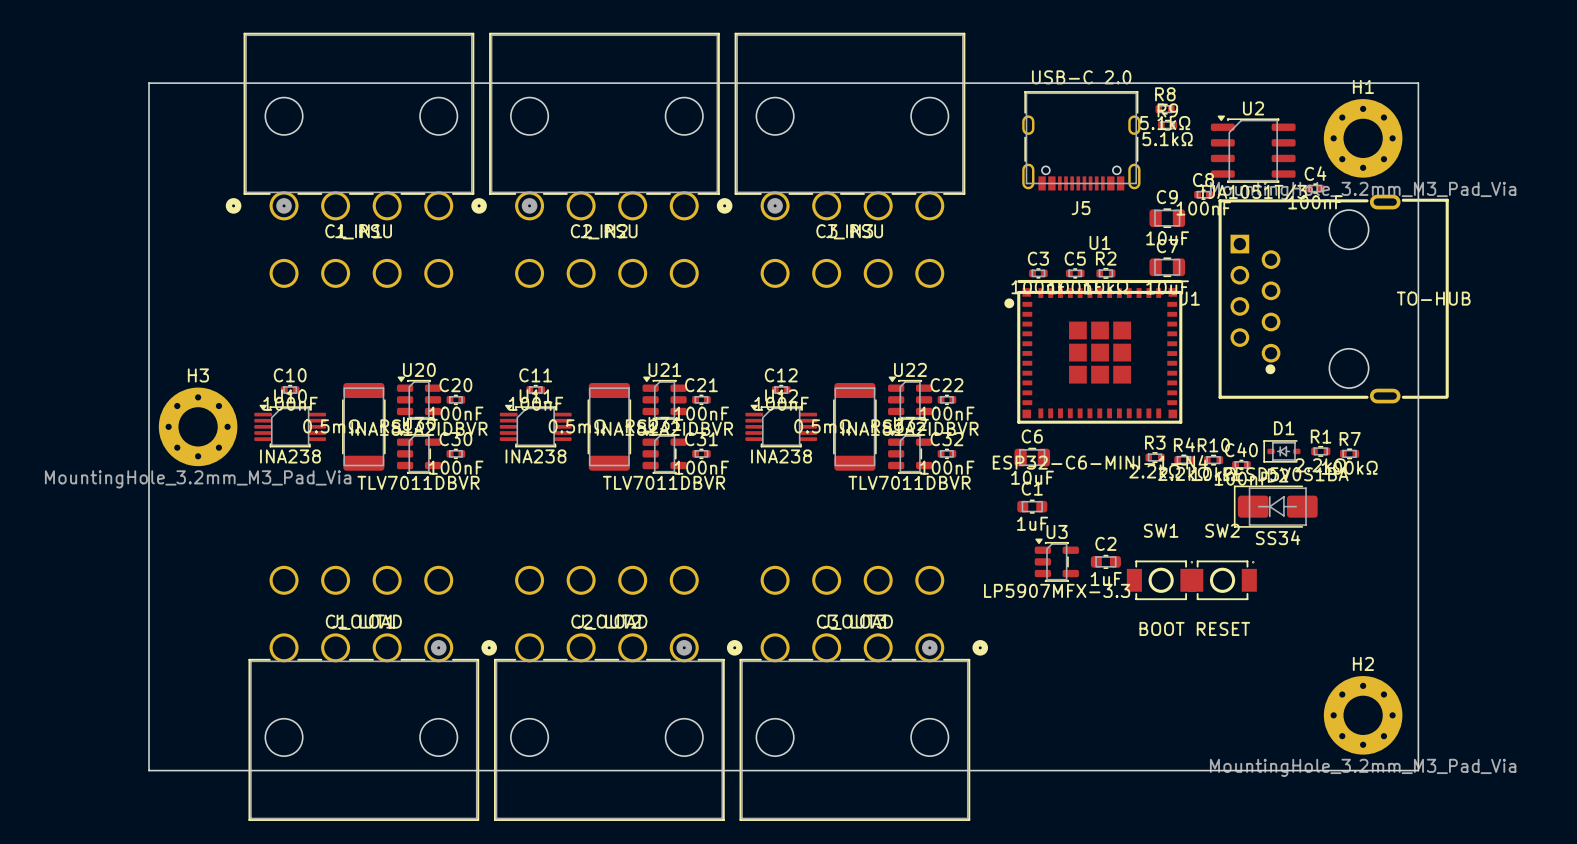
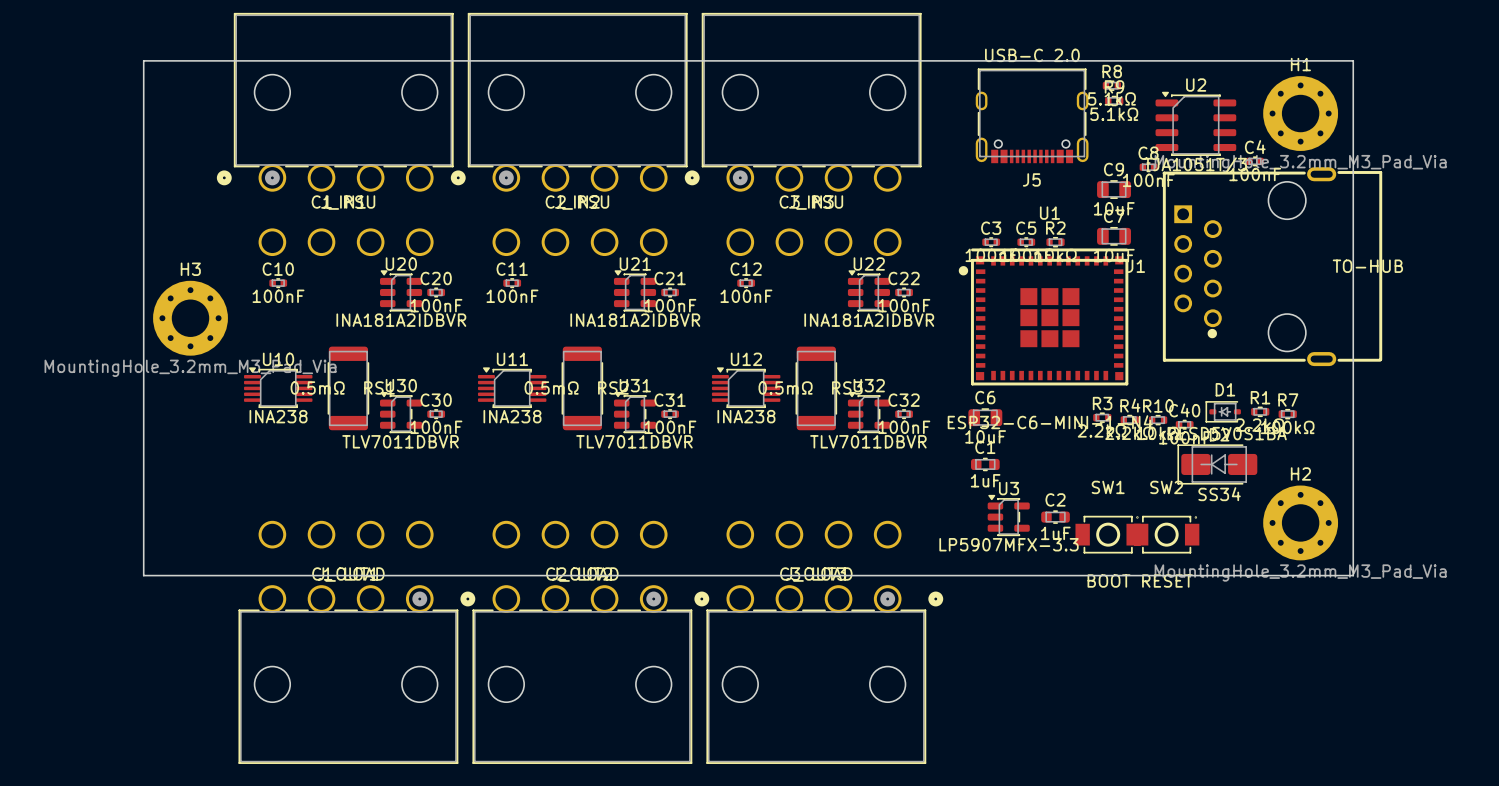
C10 position: (290, 390) -> (278, 283)
C11 position: (535, 390) -> (512, 283)
C12 position: (781, 390) -> (746, 283)
U20 position: (419, 398) -> (401, 290)
U21 position: (664, 398) -> (635, 290)
U22 position: (910, 398) -> (868, 290)
C20 position: (455, 399) -> (436, 292)
C21 position: (701, 399) -> (670, 292)
C22 position: (946, 399) -> (904, 292)
H3 position: (198, 426) -> (190, 318)
board edge: (149, 623) (149, 770) (1418, 770) (1418, 623) -> (143, 575) (1353, 575)
H2 position: (1363, 715) -> (1300, 522)

